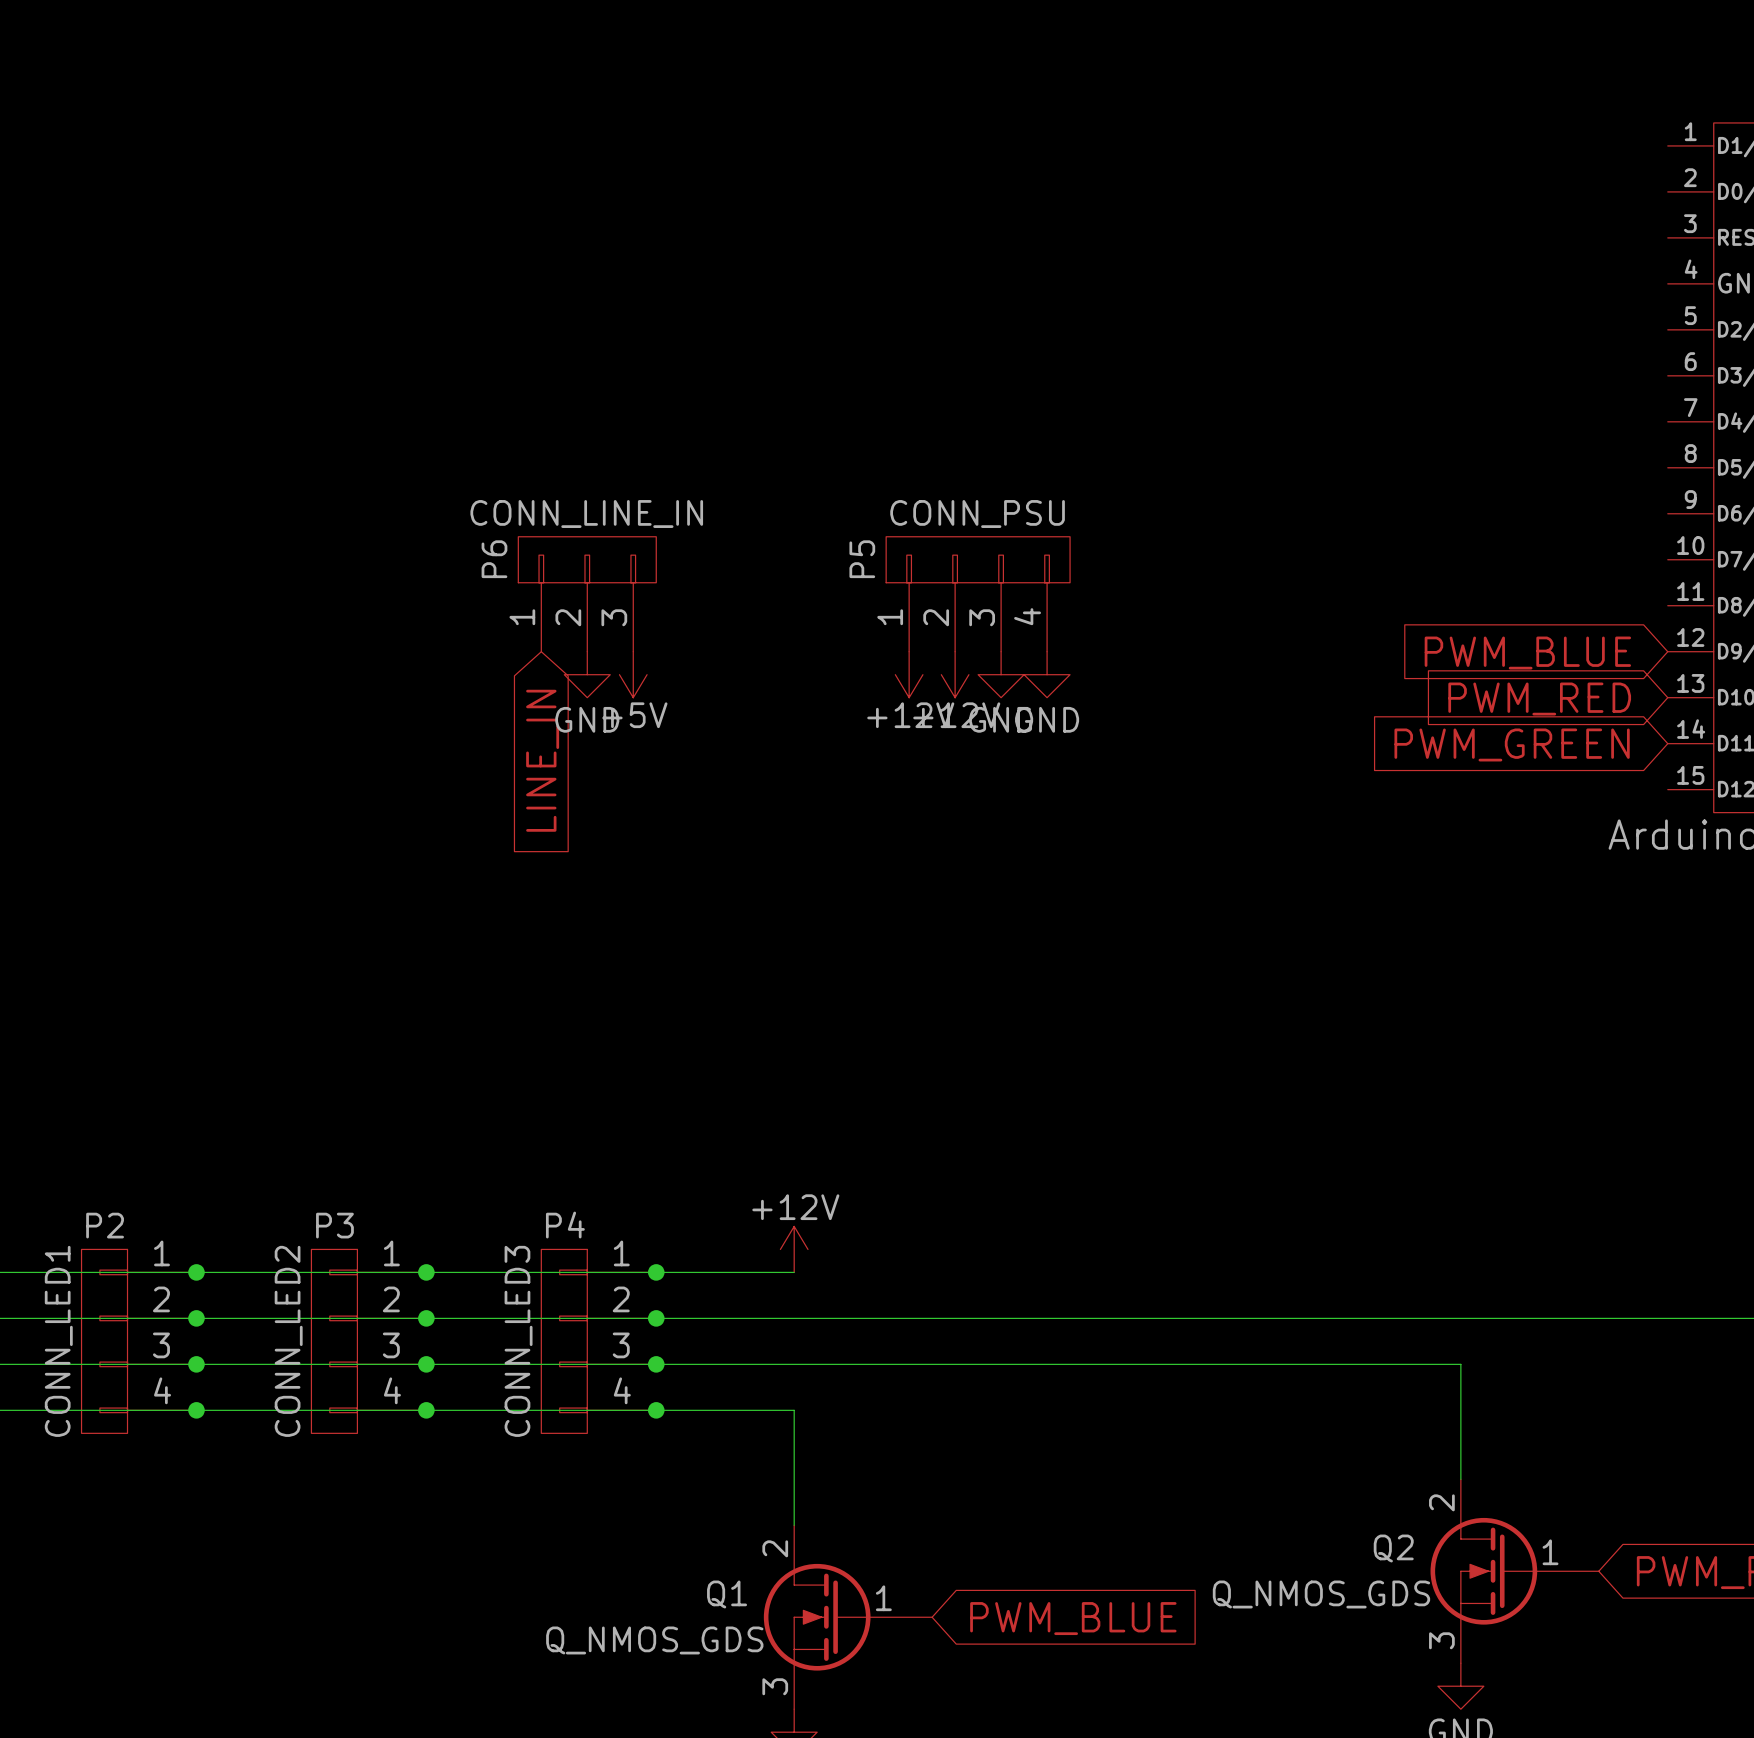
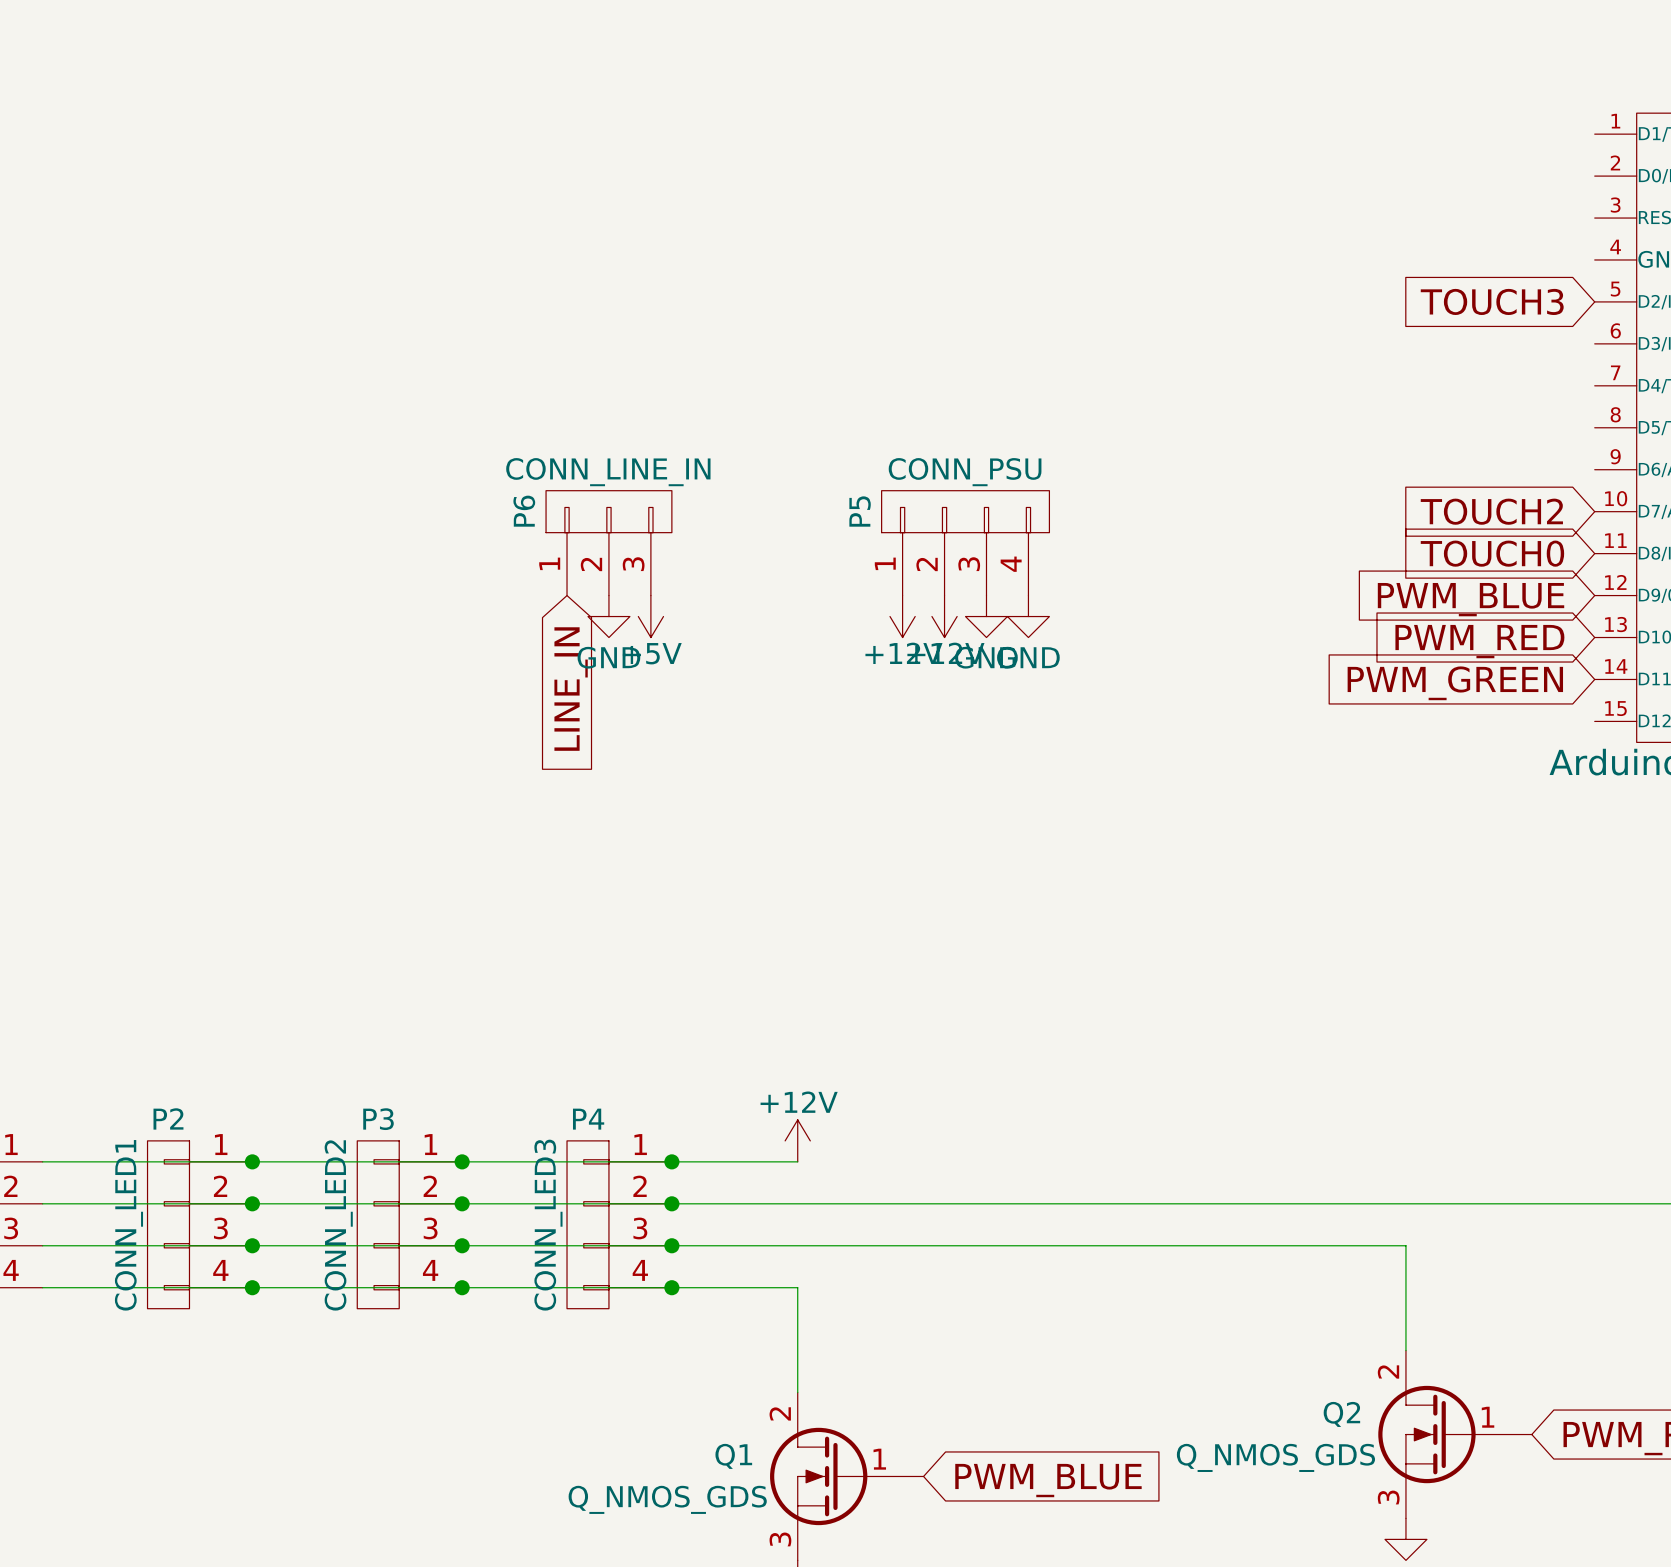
global label: none -> TOUCH3 (1492, 301)
global label: none -> TOUCH2 (1491, 511)
global label: none -> TOUCH0 (1492, 553)

